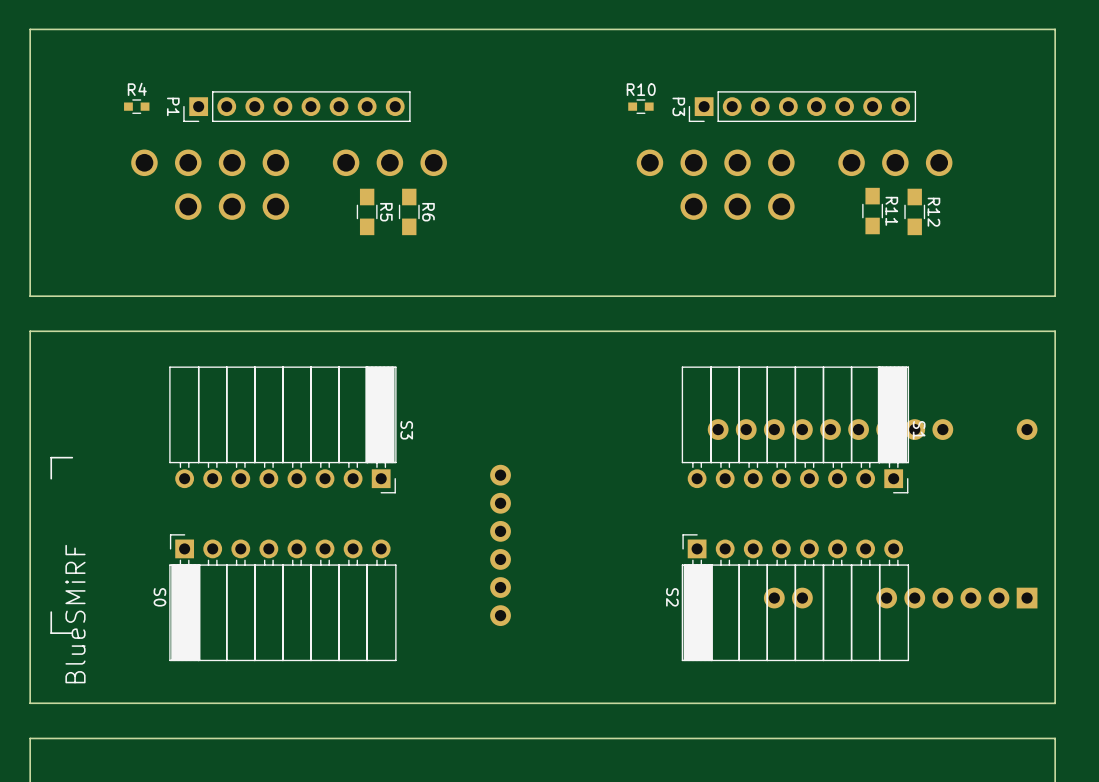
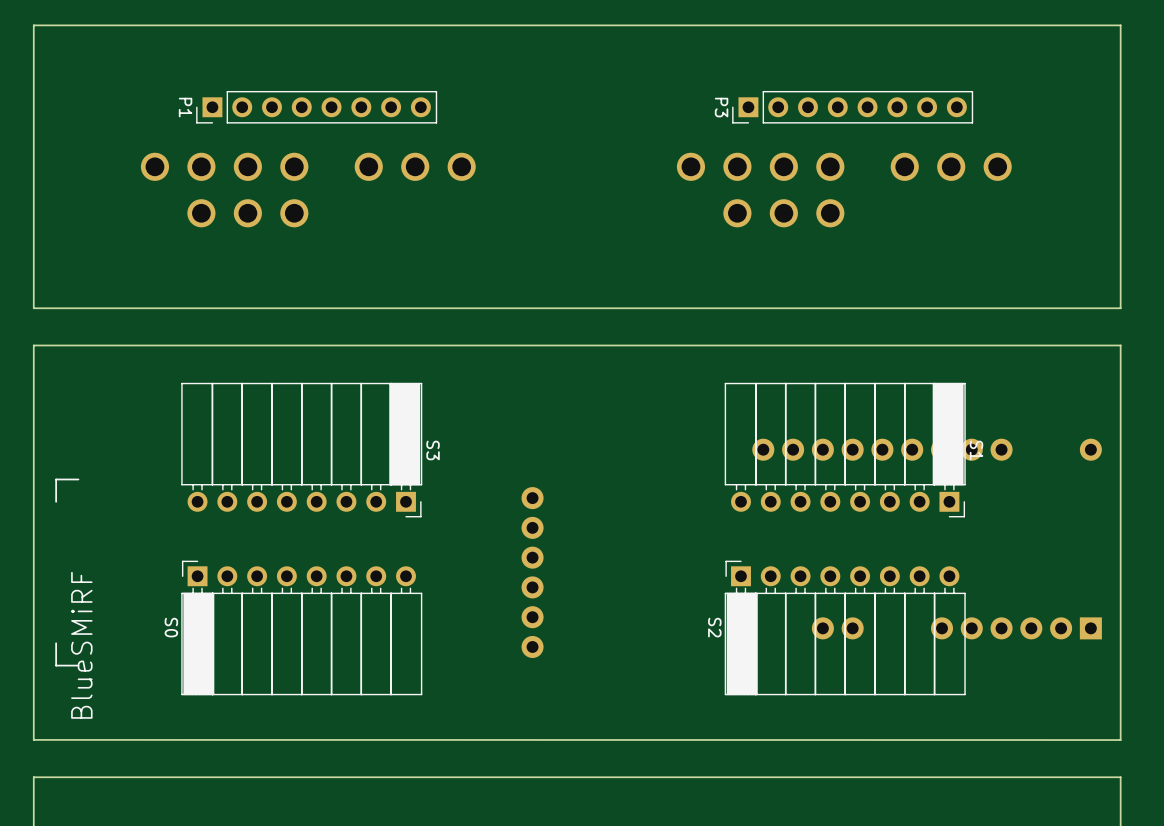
R4: (136, 106) -> none
R10: (640, 106) -> none
R5: (367, 211) -> none
R6: (409, 211) -> none
R11: (872, 211) -> none
R12: (914, 211) -> none

